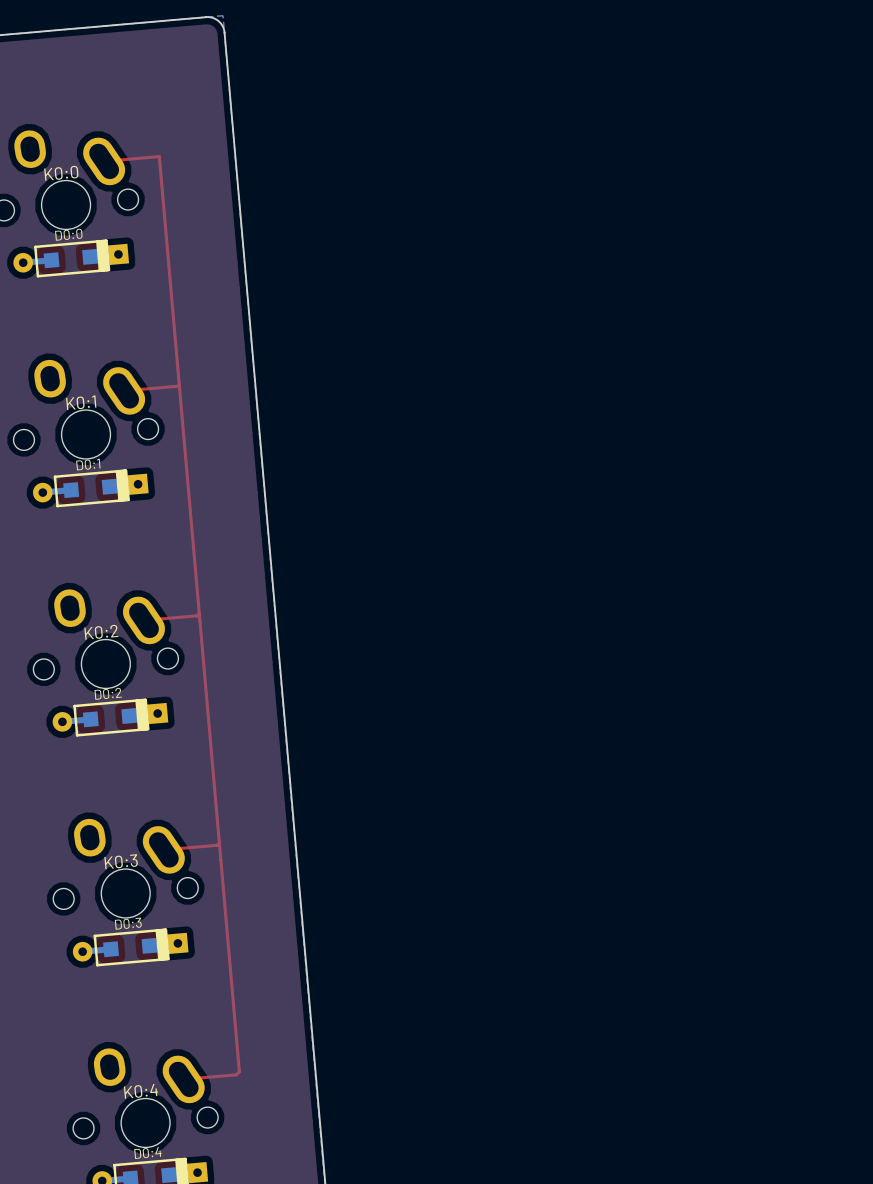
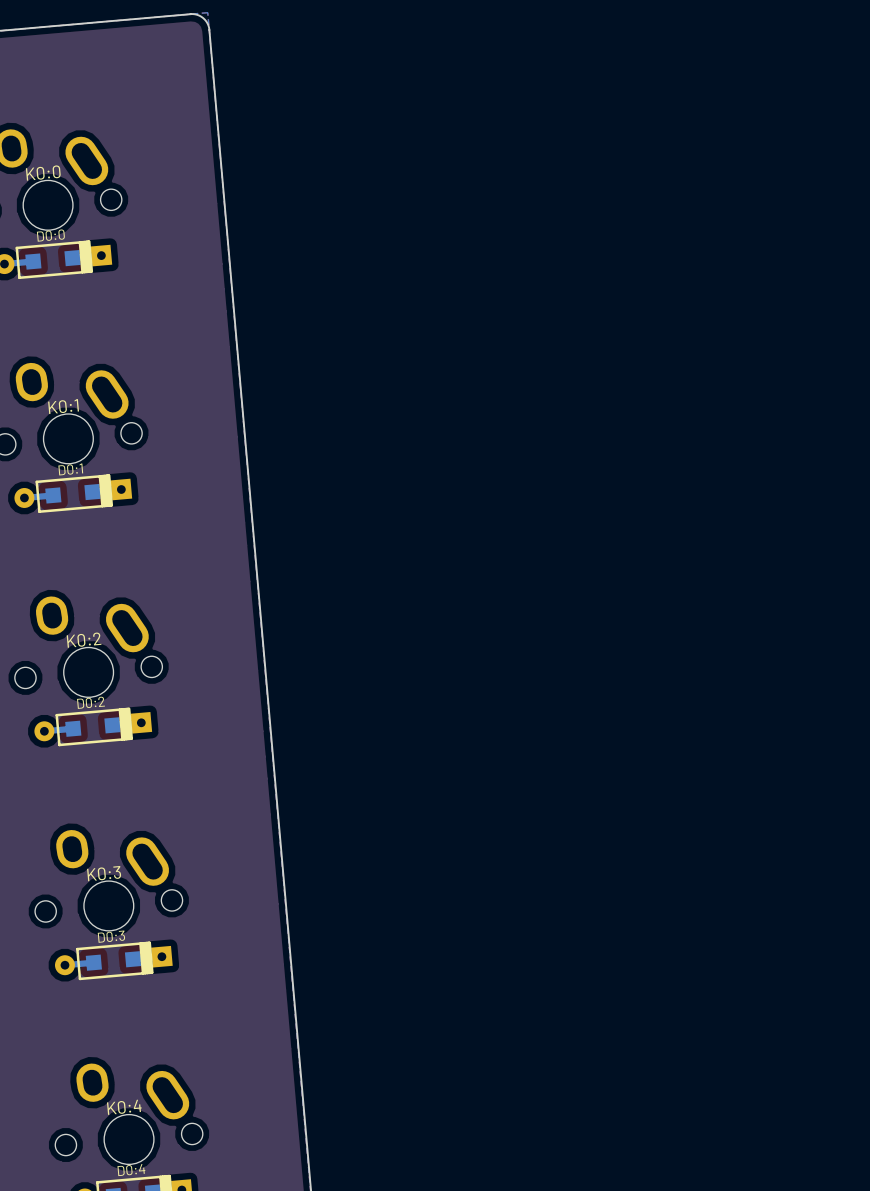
top track: (104, 161) (159, 156) (239, 1071) (236, 1074) -> none
top track: (179, 384) (177, 386) (124, 390) -> none
top track: (199, 613) (197, 615) (143, 620) -> none
top track: (219, 843) (217, 845) (163, 849) -> none
top track: (236, 1074) (183, 1079) -> none

